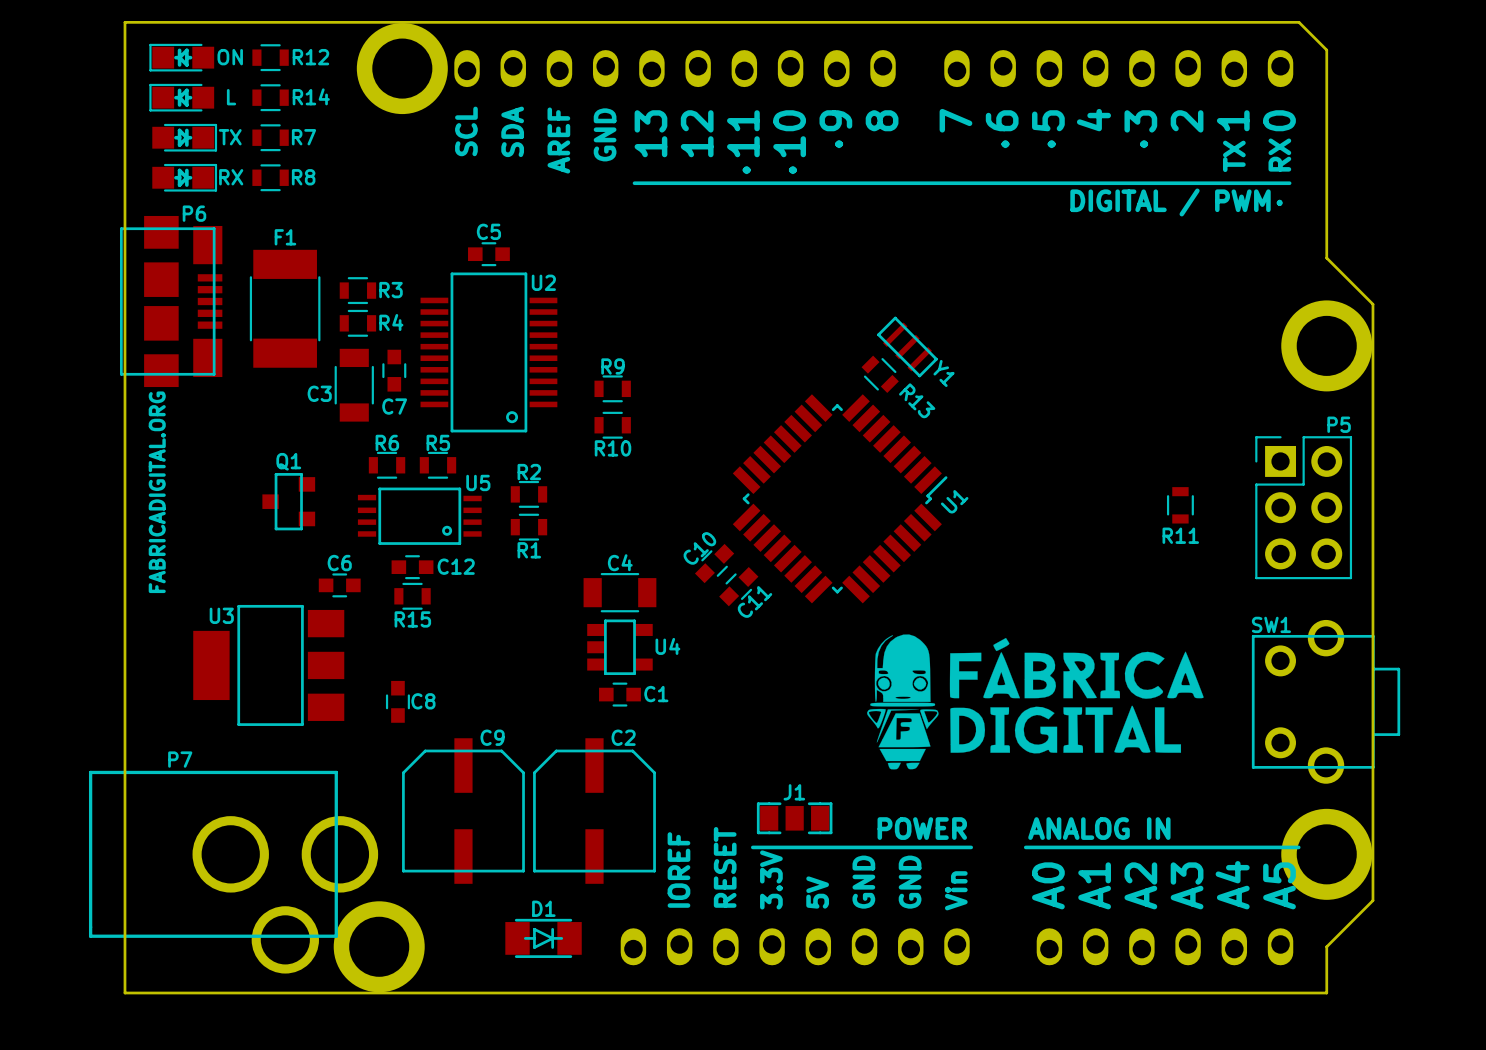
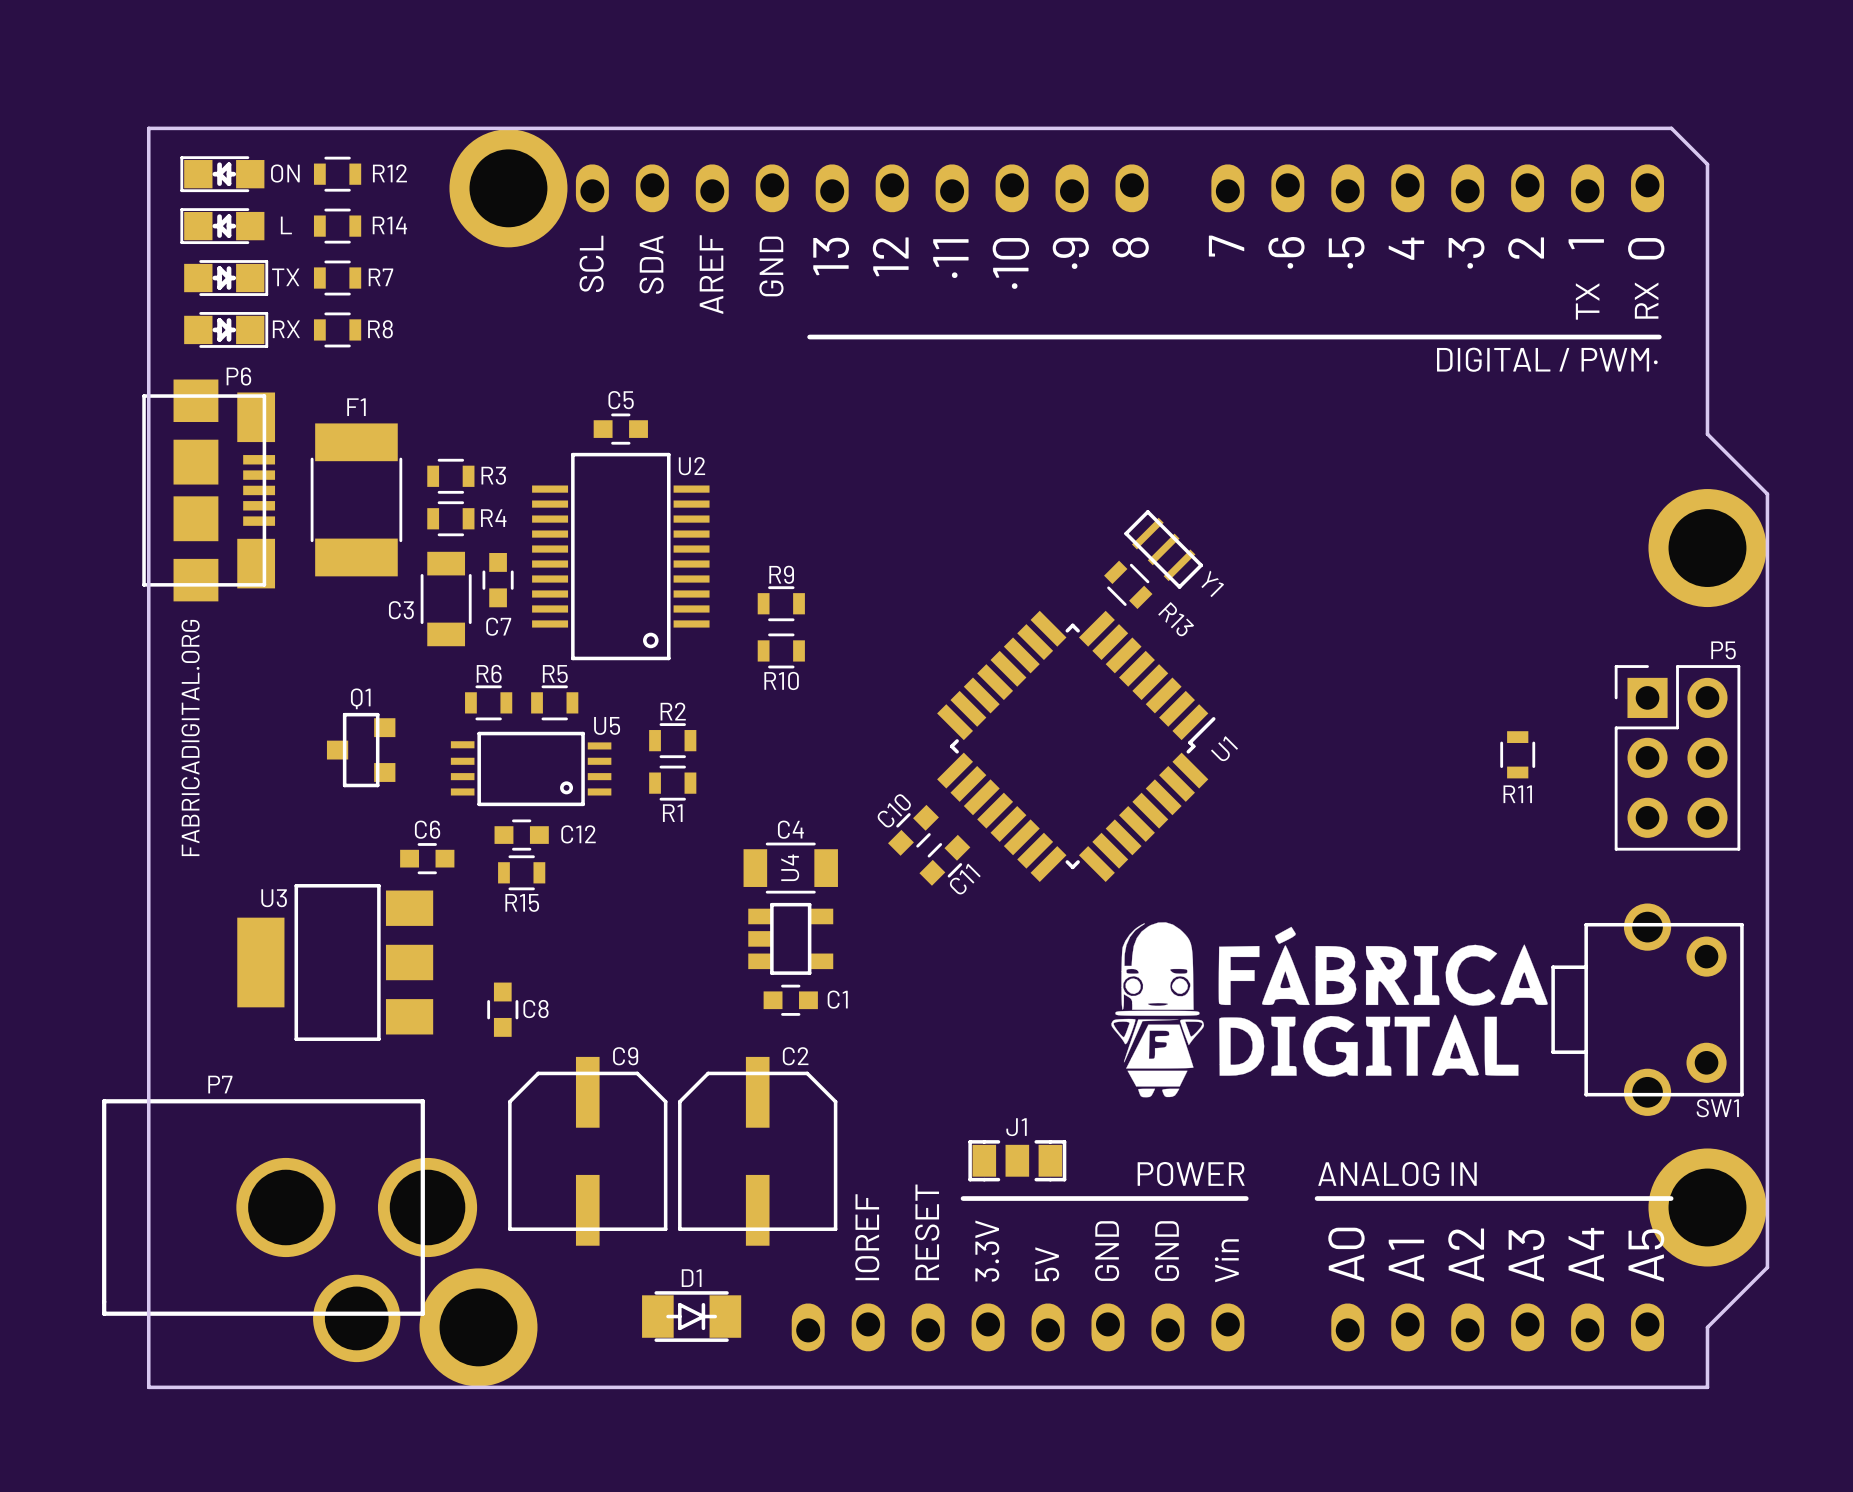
U4 name rotation: 0° (667, 646) -> 90° counterclockwise (790, 867)
U4 name position: U4 (667, 646) -> U4 (790, 867)
SW1 rotation: 0° (1326, 701) -> 180° (1647, 1009)

